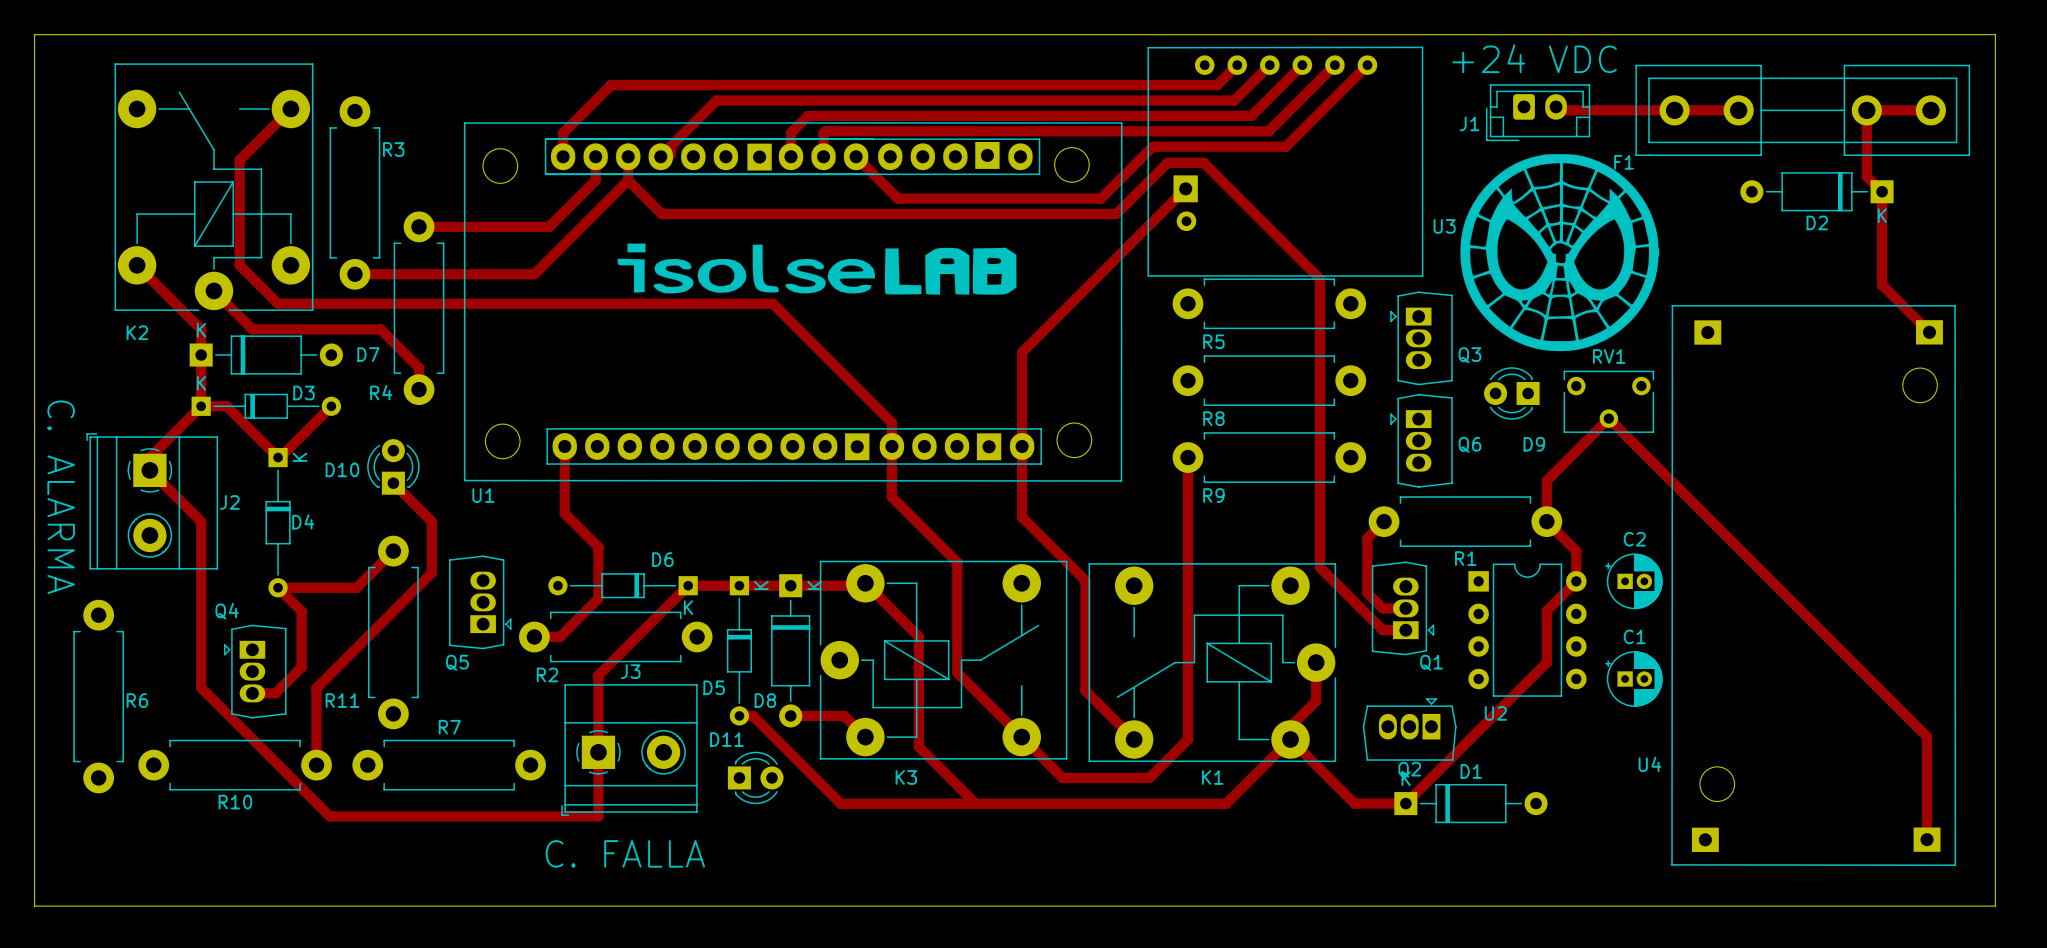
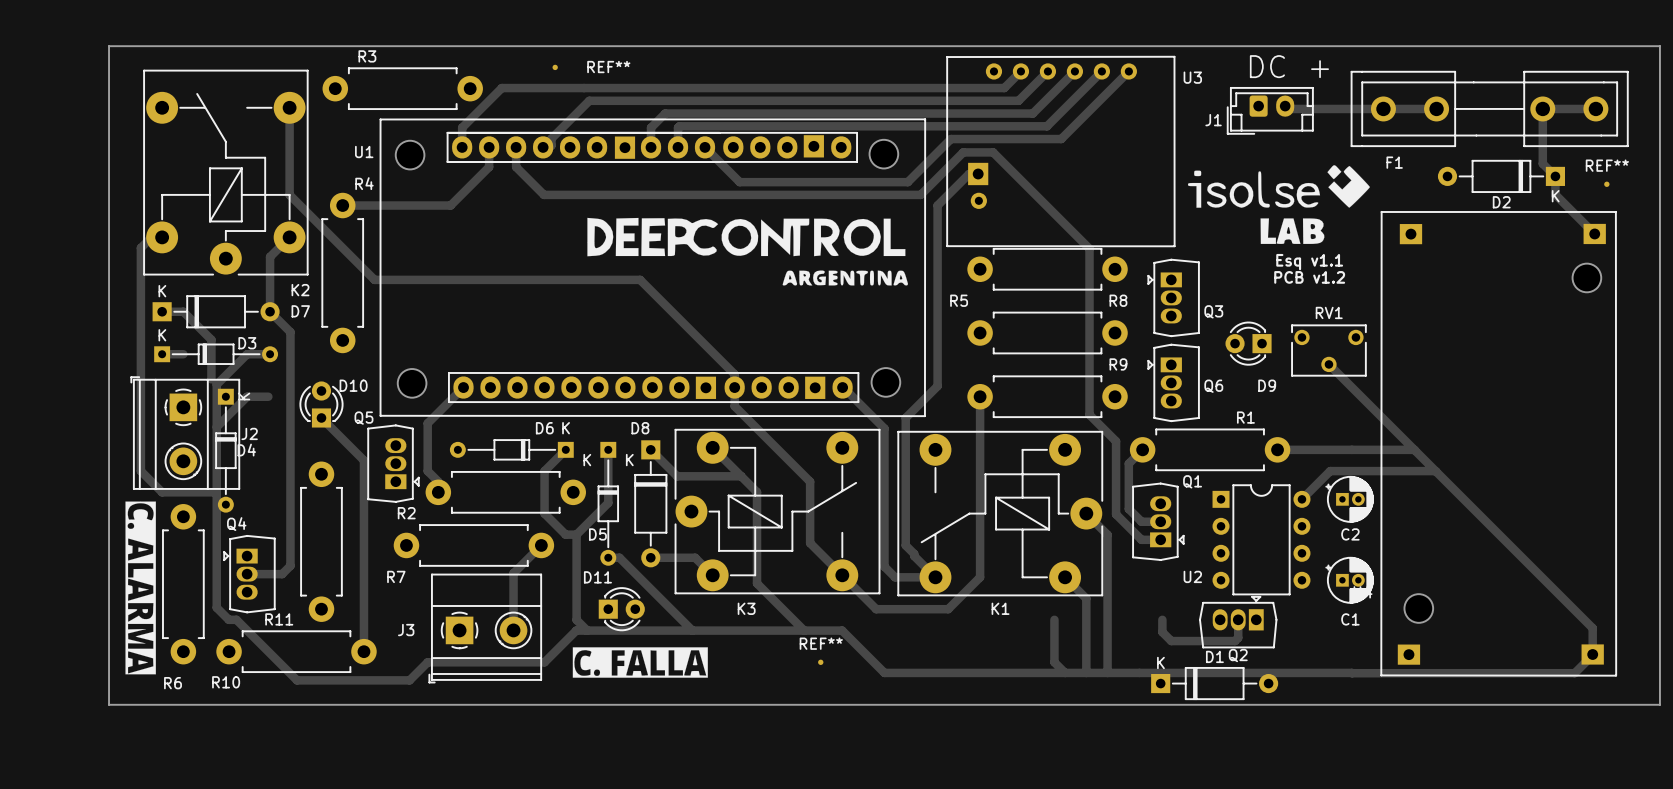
board edge: (137, 34) (34, 34) (34, 906) (1995, 906) (1995, 34) -> (109, 46) (109, 704) (1659, 704) (1659, 46) (1649, 46)
text: +24 VDC (1534, 58) -> DC (1267, 66)
REF**: none -> (555, 67)
text: none -> + (1320, 69)
track: (290, 108) (239, 160) (239, 265) (278, 303) (772, 303) (891, 422) (891, 430) -> (289, 107) (289, 194) (374, 279) (640, 279) (734, 374)
R3 name position: R3 (393, 149) -> R3 (367, 56)
drawing: [1460, 154, 1660, 352] -> none
F1 name position: F1 (1624, 162) -> F1 (1394, 162)
drawing: none -> [1187, 165, 1370, 244]
track: (628, 180) (534, 274) (354, 274) -> none
K2 position: (213, 187) -> (225, 172)
track: (1185, 188) (1022, 352) (1022, 517) (1085, 580) (1085, 690) (1134, 739) -> (978, 173) (969, 173) (937, 205) (937, 386) (905, 417) (905, 545) (935, 577) (895, 577) (884, 566) (884, 428) (842, 387)
R3 rotation: 0° (354, 192) -> 90° clockwise (402, 88)
R3 position: (354, 192) -> (402, 88)
REF**: none -> (1606, 184)
track: (1882, 213) (1882, 284) (1929, 332) -> (1555, 194) (1594, 233)
U3 name position: U3 (1444, 226) -> U3 (1192, 77)
drawing: none -> [587, 217, 908, 286]
drawing: [617, 243, 1017, 295] -> none
track: (137, 265) (201, 329) (201, 406) (149, 457) (149, 470) (201, 521) (201, 687) (329, 816) (598, 816) (598, 675) (688, 585) (862, 585) (865, 583) (918, 636) -> (712, 447) (757, 492) (757, 545)
track: none -> (162, 237) (151, 237) (140, 248) (140, 471) (162, 492) (216, 492)
track: none -> (289, 237) (270, 256) (270, 311) (290, 332) (290, 565) (282, 574) (247, 574)
track: (213, 290) (252, 329) (380, 329) (419, 367) (419, 389) -> none
text: none -> Esq v1.1 (1309, 262)
text: none -> PCB v1.2 (1309, 277)
K2 name position: K2 (137, 332) -> K2 (300, 290)
R5 name position: R5 (1213, 341) -> R5 (959, 300)
track: none -> (162, 311) (183, 311) (211, 339) (211, 379)
R4 name position: R4 (381, 392) -> R4 (364, 183)
track: (226, 406) (278, 457) (331, 406) -> none
R8 name position: R8 (1213, 418) -> R8 (1118, 300)
track: (1608, 418) (1546, 480) (1546, 521) (1576, 551) (1576, 581) (1546, 610) (1546, 662) (1405, 803) (1354, 803) (1290, 739) -> none
track: (564, 446) (564, 513) (598, 547) (598, 598) (560, 636) (534, 636) -> (463, 387) (427, 423) (427, 471) (438, 481) (438, 492)
track: none -> (268, 396) (247, 396) (216, 427)
D10 name position: D10 (342, 469) -> D10 (353, 385)
track: (891, 469) (891, 497) (957, 562) (957, 672) (1062, 777) (1149, 777) (1187, 739) (1187, 675) -> (734, 406) (810, 481) (810, 543) (876, 609) (948, 609) (980, 577)
track: (1319, 479) (1319, 567) (1352, 599) -> (1089, 414) (1116, 441) (1116, 514)
U1 name position: U1 (483, 495) -> U1 (364, 152)
R9 name position: R9 (1213, 495) -> R9 (1118, 364)
text: C. ALARMA (61, 497) -> none
J2 position: (152, 501) -> (185, 433)
track: (431, 521) (431, 572) (316, 688) (316, 765) -> (353, 449) (363, 460) (363, 651)
track: none -> (565, 449) (544, 471) (544, 513) (565, 534) (576, 534)
track: none -> (608, 449) (608, 502) (576, 534)
track: none -> (650, 449) (677, 476) (741, 476)
track: none -> (1277, 449) (1414, 449)
C2 name position: C2 (1634, 539) -> C2 (1350, 534)
track: none -> (1435, 471) (1330, 471) (1301, 499)
track: (393, 551) (356, 587) (278, 587) (301, 611) (301, 667) (275, 693) (252, 693) -> none
R1 name position: R1 (1465, 558) -> R1 (1245, 417)
drawing: none -> [125, 501, 156, 675]
D6 position: (623, 585) -> (511, 449)
D5 text rotation: 0° (761, 585) -> 90° clockwise (587, 460)
D5 text position: K (761, 585) -> K (587, 460)
D8 text rotation: 0° (814, 585) -> 90° clockwise (629, 460)
D8 text position: K (814, 585) -> K (629, 460)
U4 position: (1813, 585) -> (1498, 443)
track: none -> (1086, 513) (1107, 534) (1107, 672)
Q5 position: (480, 602) -> (393, 463)
D6 text position: K (688, 607) -> K (566, 428)
Q4 name position: Q4 (227, 611) -> Q4 (236, 524)
track: none -> (576, 534) (576, 619) (586, 630)
R2 position: (615, 636) -> (505, 492)
track: none -> (541, 545) (513, 573) (513, 630)
C1 name position: C1 (1634, 636) -> C1 (1350, 619)
track: (1316, 649) (1316, 701) (1290, 726) -> none
D5 position: (739, 650) -> (608, 503)
D8 position: (790, 650) -> (650, 503)
track: none -> (608, 557) (619, 557) (692, 630)
K3 position: (943, 660) -> (777, 511)
Q5 name position: Q5 (457, 662) -> Q5 (363, 418)
K1 position: (1212, 662) -> (1000, 513)
Q1 name position: Q1 (1431, 662) -> Q1 (1192, 481)
Q4 position: (255, 671) -> (249, 574)
J3 name position: J3 (630, 671) -> J3 (406, 630)
R2 name position: R2 (547, 674) -> R2 (406, 513)
track: none -> (1075, 577) (1065, 577) (1086, 598) (1086, 672)
track: (918, 682) (918, 746) (975, 803) -> (757, 583) (804, 630)
D5 name position: D5 (714, 687) -> D5 (597, 534)
R6 position: (98, 696) -> (183, 584)
R6 name position: R6 (137, 700) -> R6 (173, 683)
R11 name position: R11 (342, 700) -> R11 (279, 619)
D8 name position: D8 (765, 700) -> D8 (640, 428)
U2 name position: U2 (1495, 713) -> U2 (1192, 576)
track: (739, 715) (753, 715) (840, 803) (1226, 803) (1290, 739) -> none
track: (790, 715) (844, 715) (865, 737) -> (650, 557) (695, 557) (712, 575)
track: none -> (1054, 619) (1054, 662) (1065, 672)
track: none -> (1162, 619) (1162, 632) (1171, 641) (1235, 641) (1238, 637) (1238, 619)
R7 name position: R7 (449, 727) -> R7 (396, 576)
Q2 position: (1409, 729) -> (1238, 622)
J3 position: (629, 750) -> (485, 628)
drawing: none -> [572, 647, 708, 678]
R10 position: (235, 765) -> (296, 651)
R7 position: (449, 765) -> (473, 545)
track: (1927, 769) (1927, 839) -> (1592, 655) (1574, 673) (884, 672) (842, 630) (576, 630) (544, 662) (427, 662) (409, 680) (297, 680) (236, 619) (228, 619) (216, 607) (216, 384) (247, 354) (270, 354)
D11 position: (755, 777) -> (621, 609)
REF**: none -> (820, 662)
R10 name position: R10 (235, 802) -> R10 (226, 682)
text: C. FALLA (625, 853) -> none

